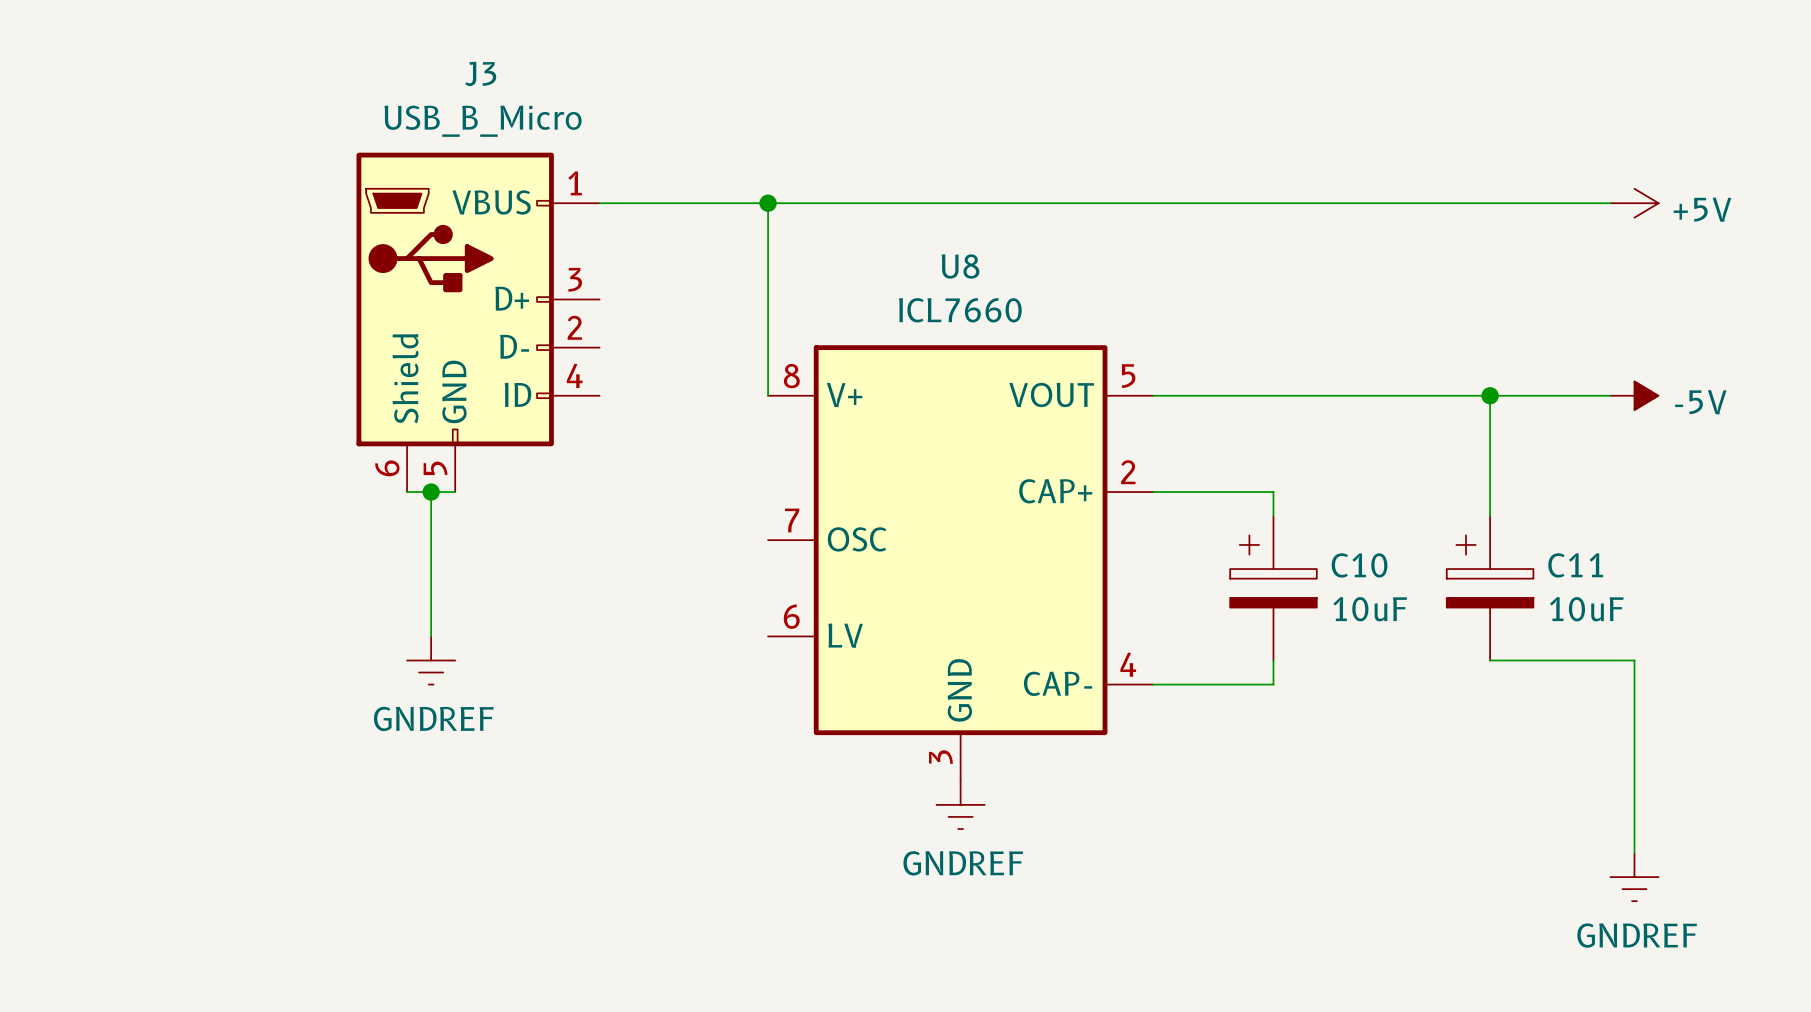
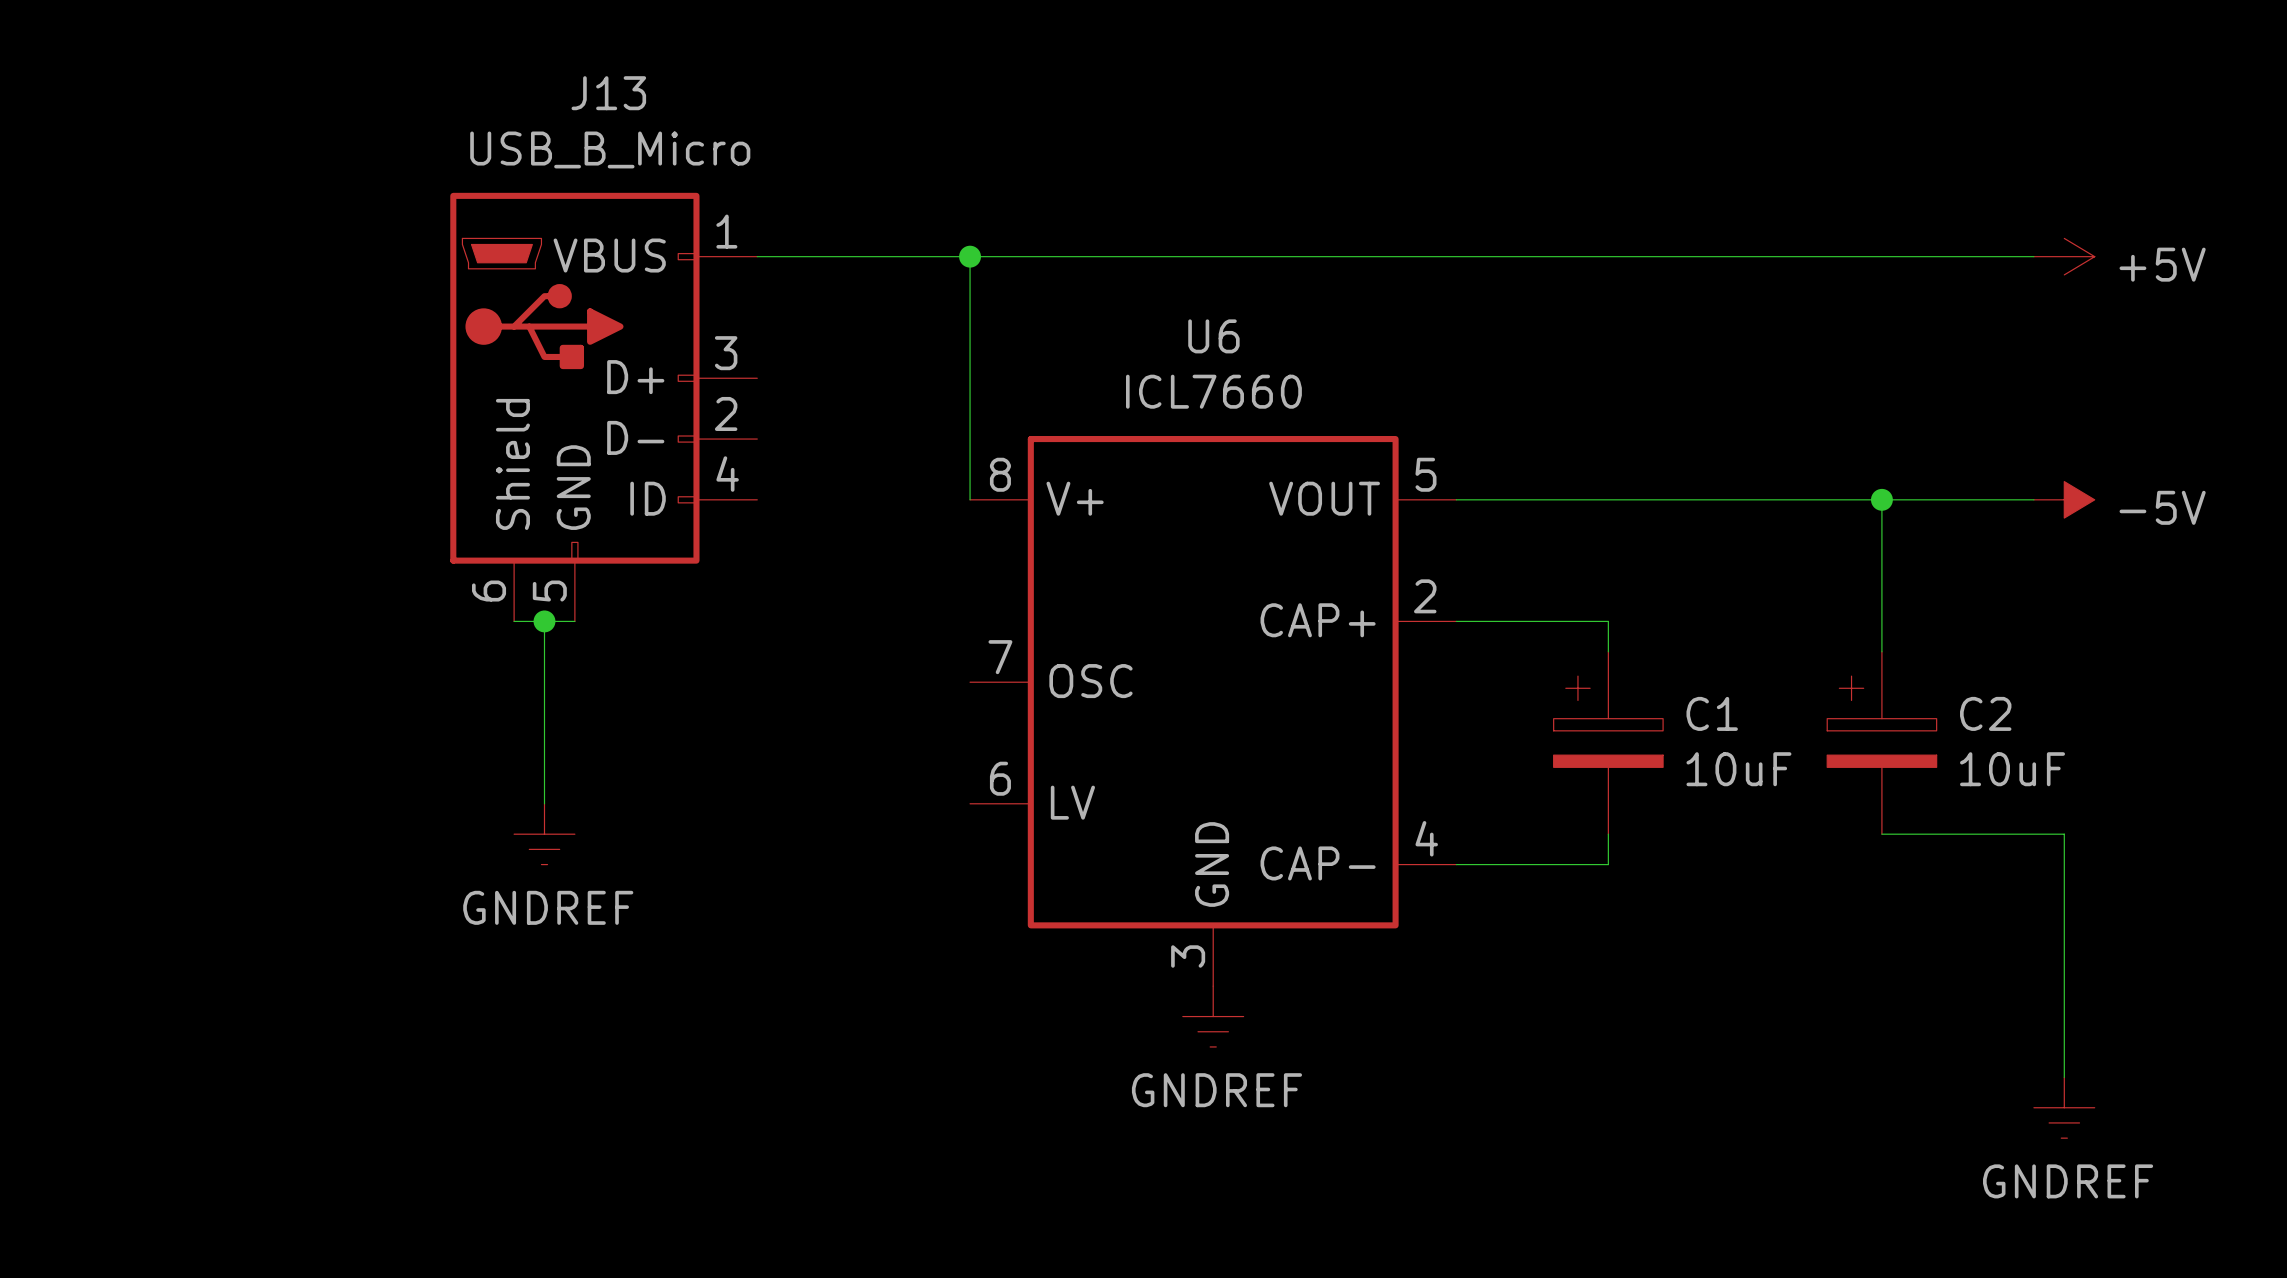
J3 name: J3 (480, 73) -> J13 (608, 93)
U8 name: U8 (960, 266) -> U6 (1213, 336)
C10 name: C10 (1359, 565) -> C1 (1712, 713)
C11 name: C11 (1575, 565) -> C2 (1985, 713)

